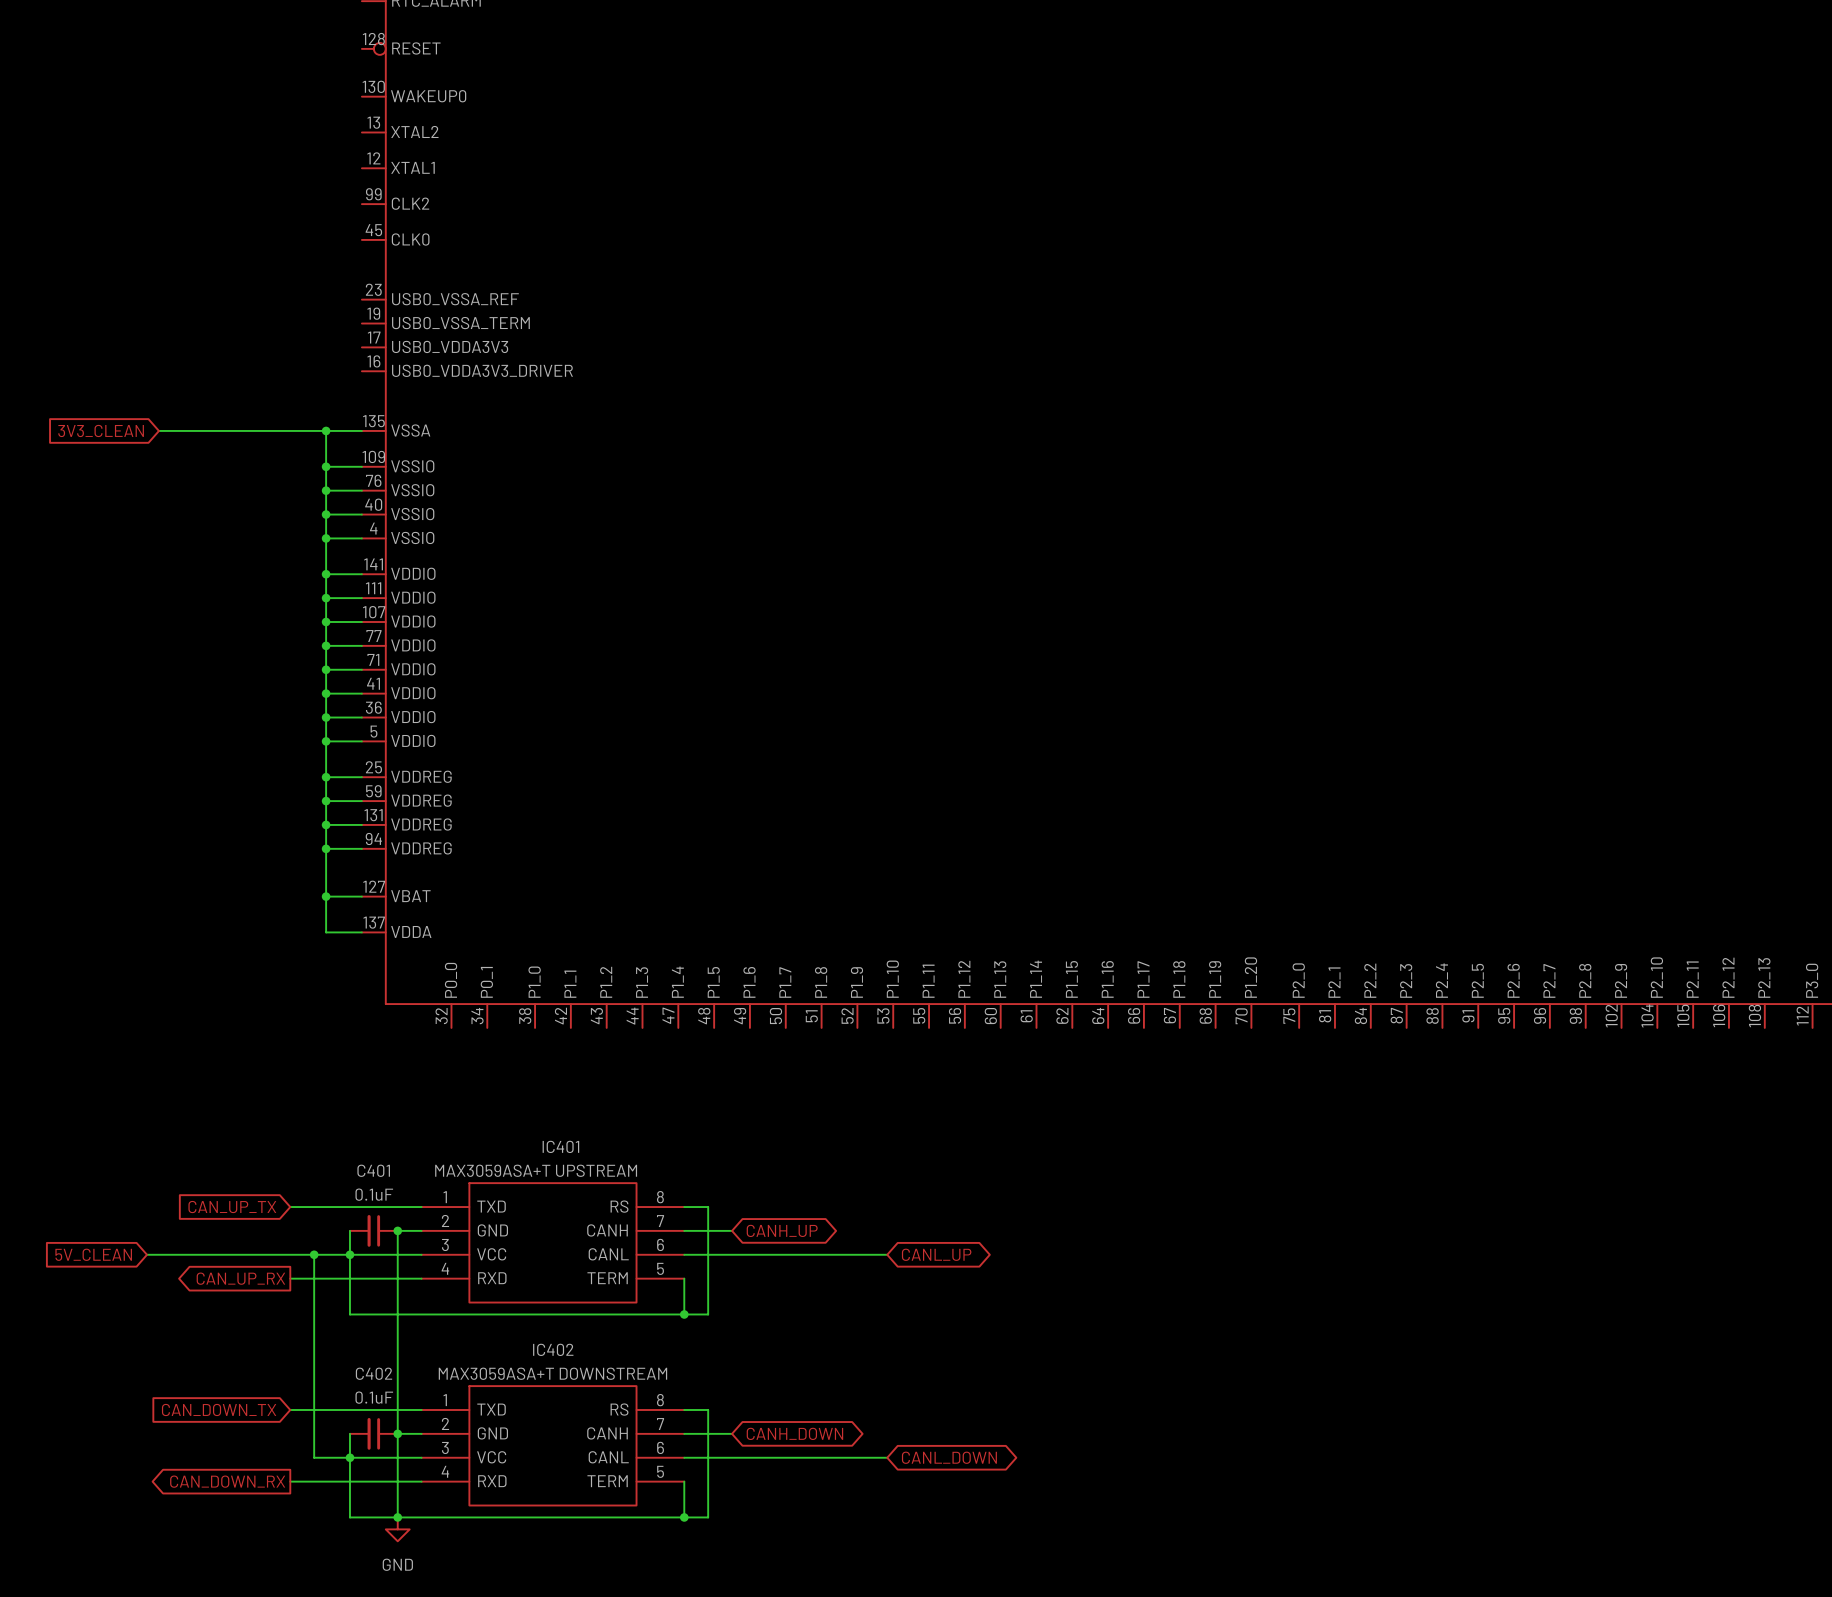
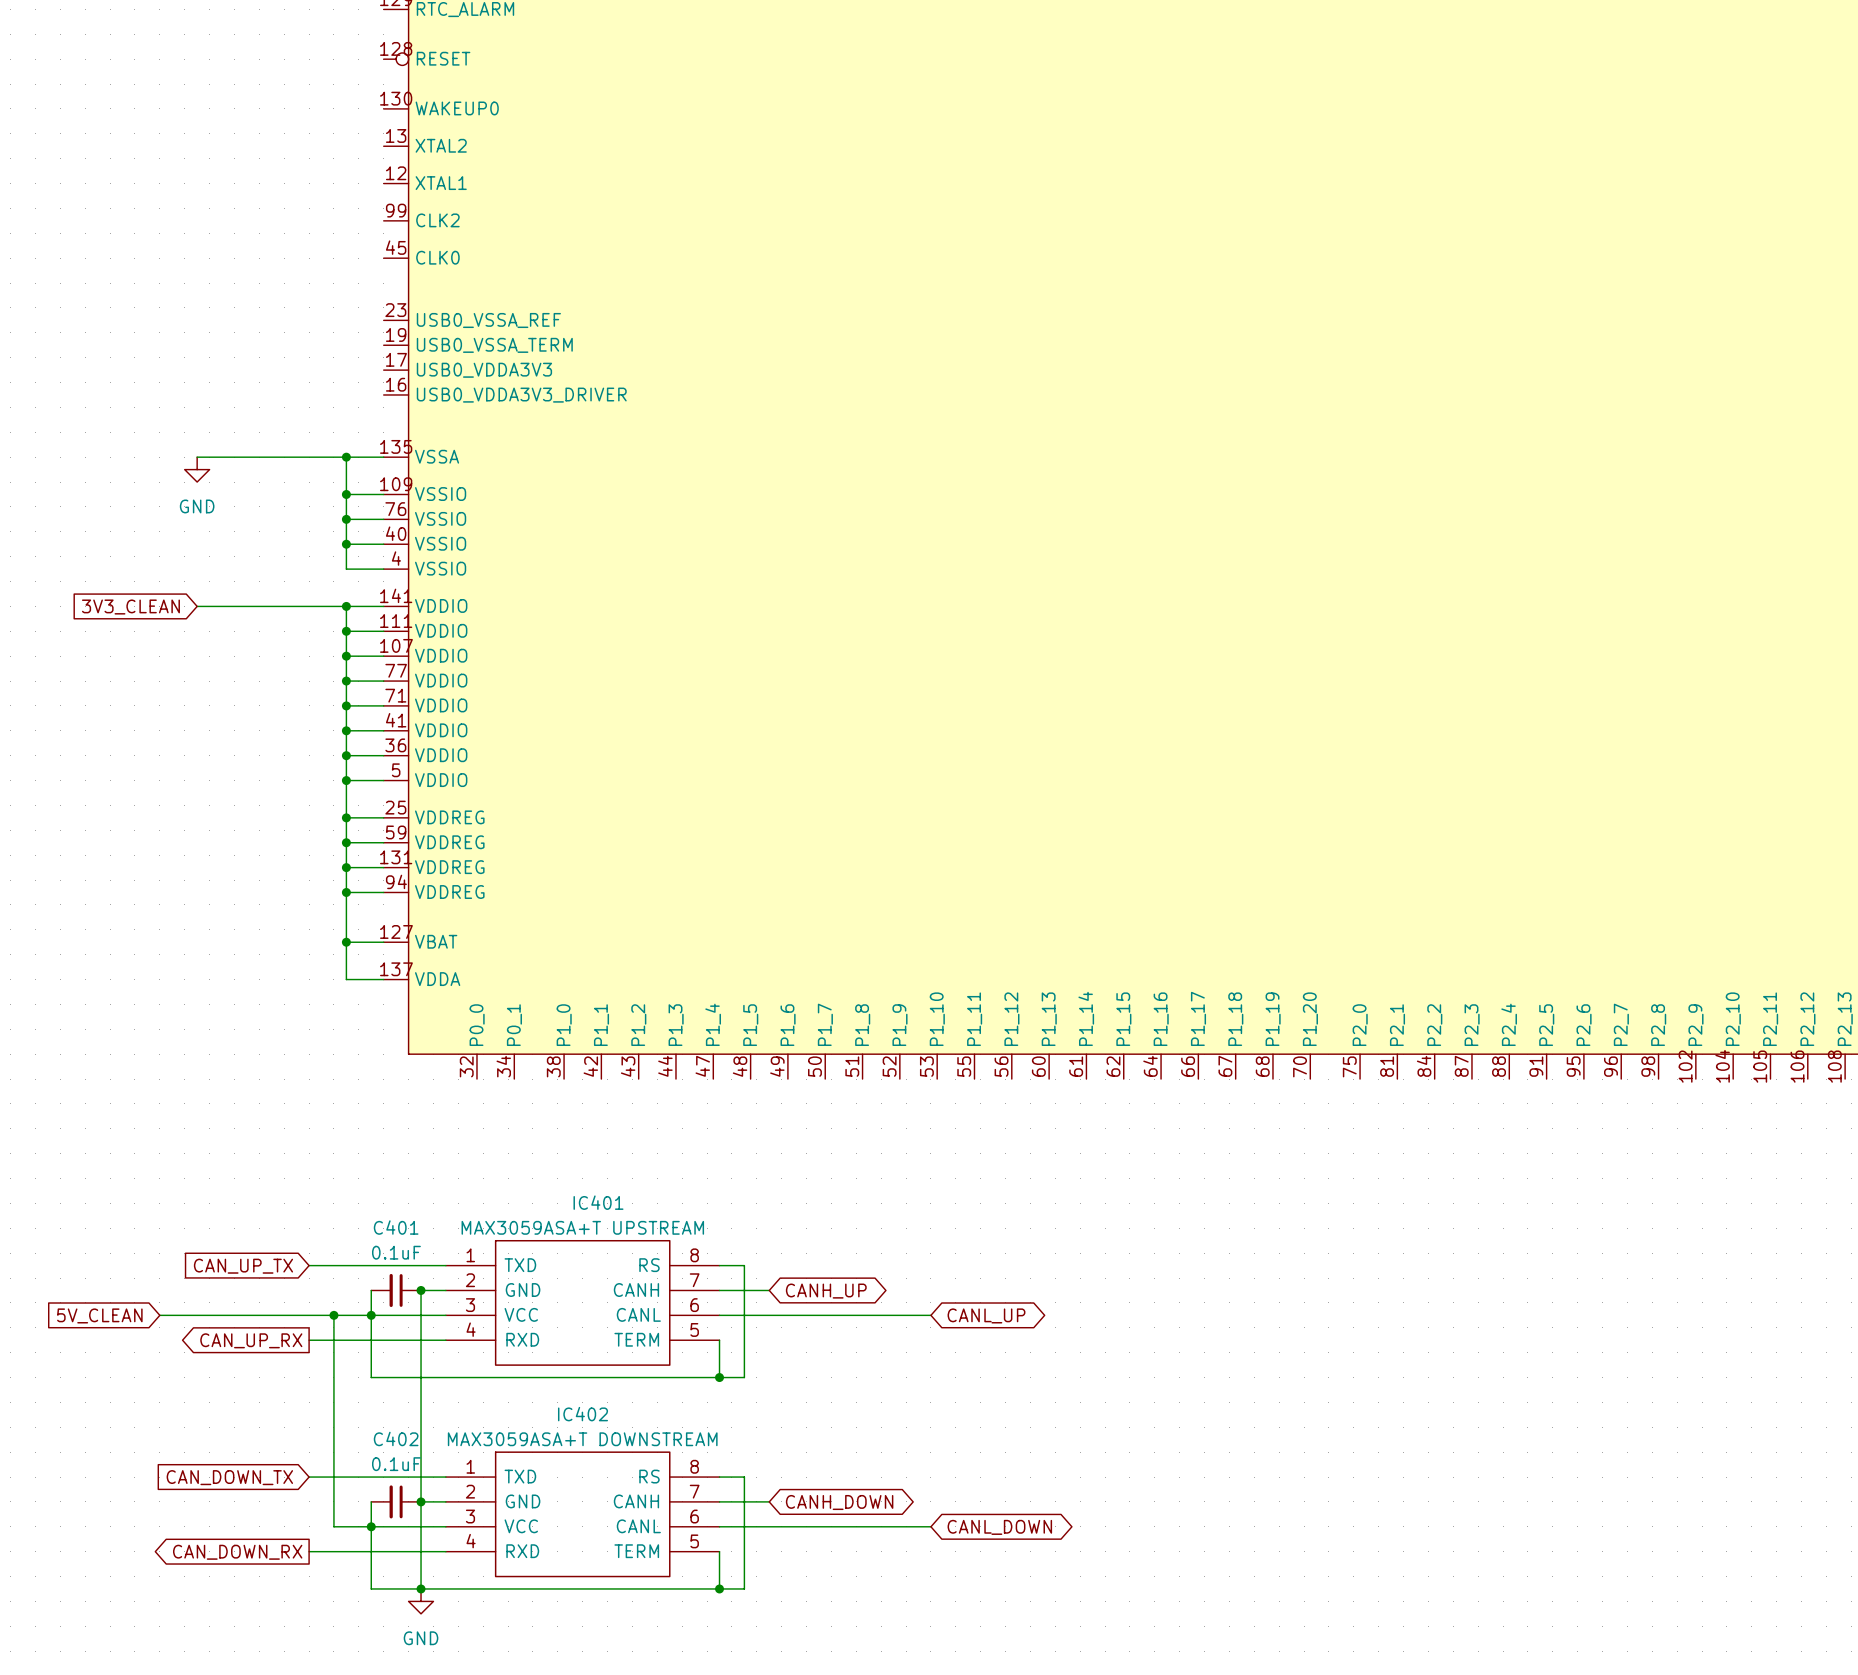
global label position: 3V3_CLEAN (101, 430) -> 3V3_CLEAN (130, 607)
wire: (158, 430) (182, 430) -> none
power symbol: none -> GND (197, 469)
wire: (326, 538) (326, 574) -> (197, 606) (346, 606)
junction: (326, 538) -> none

